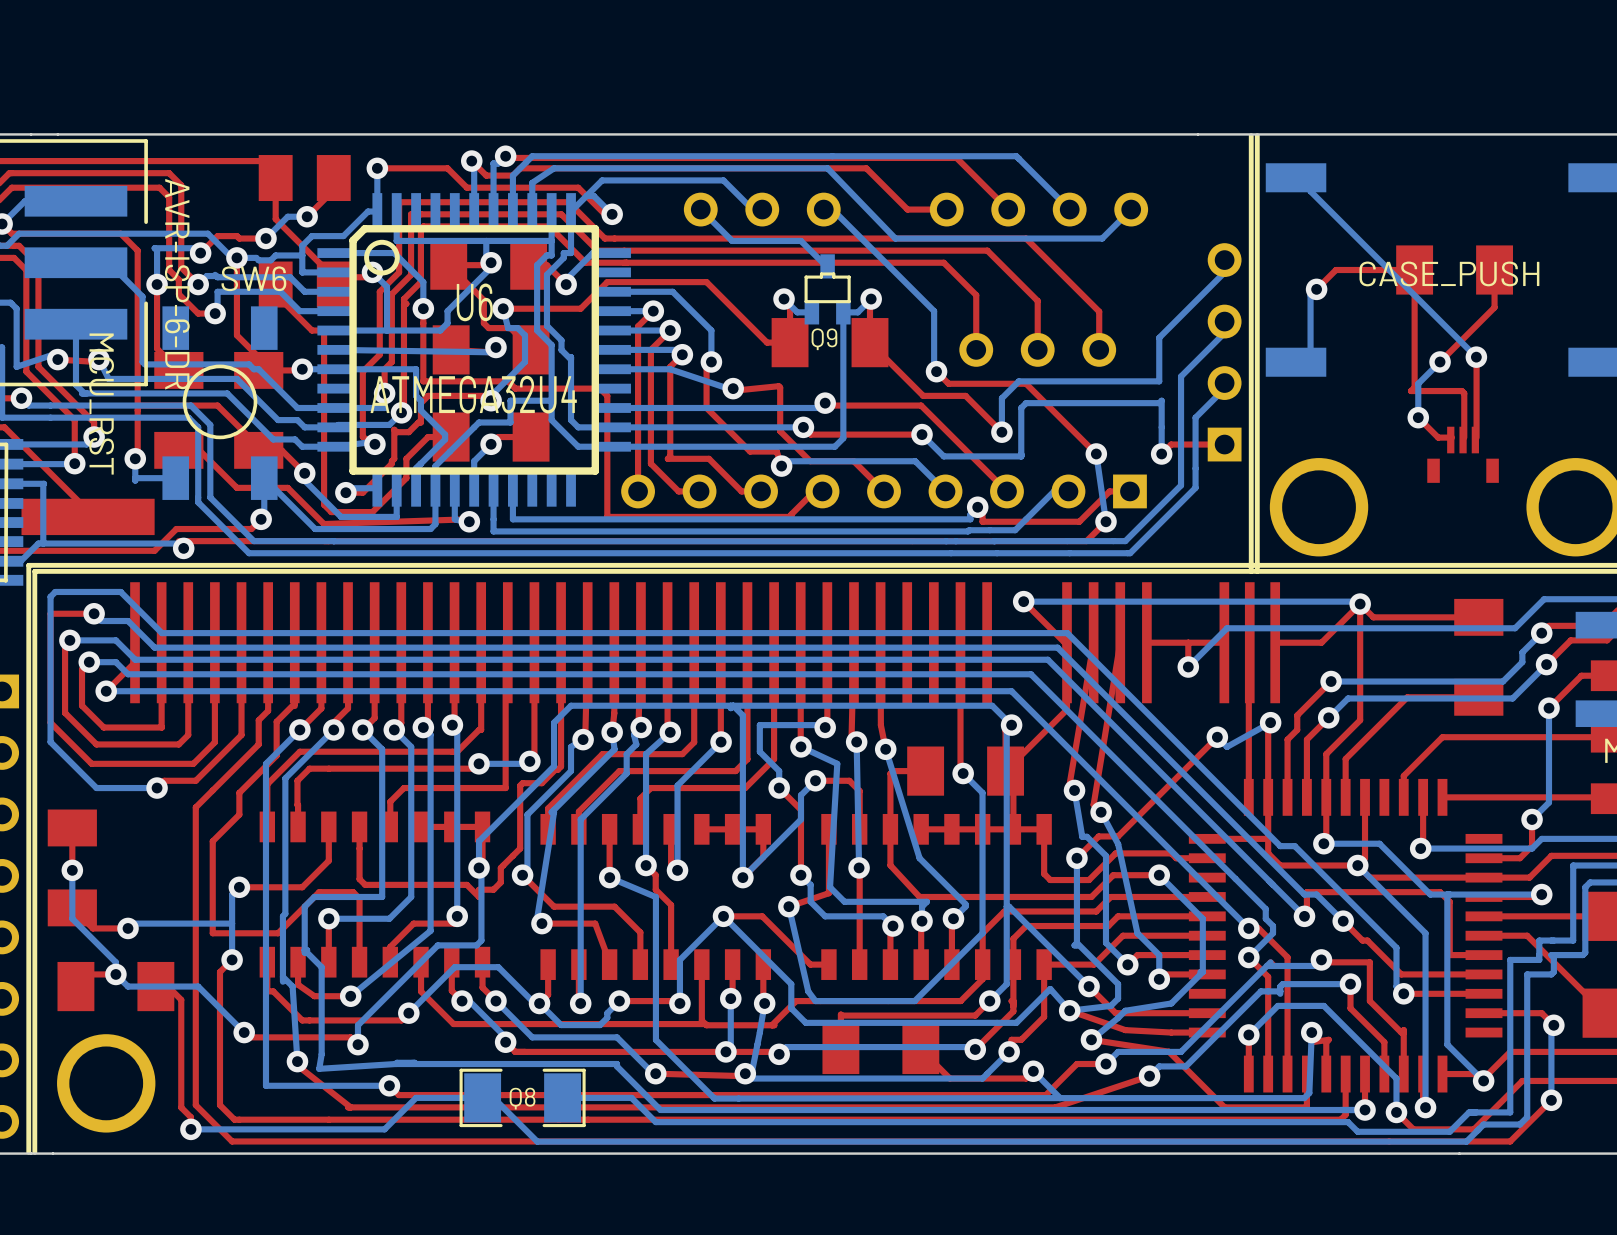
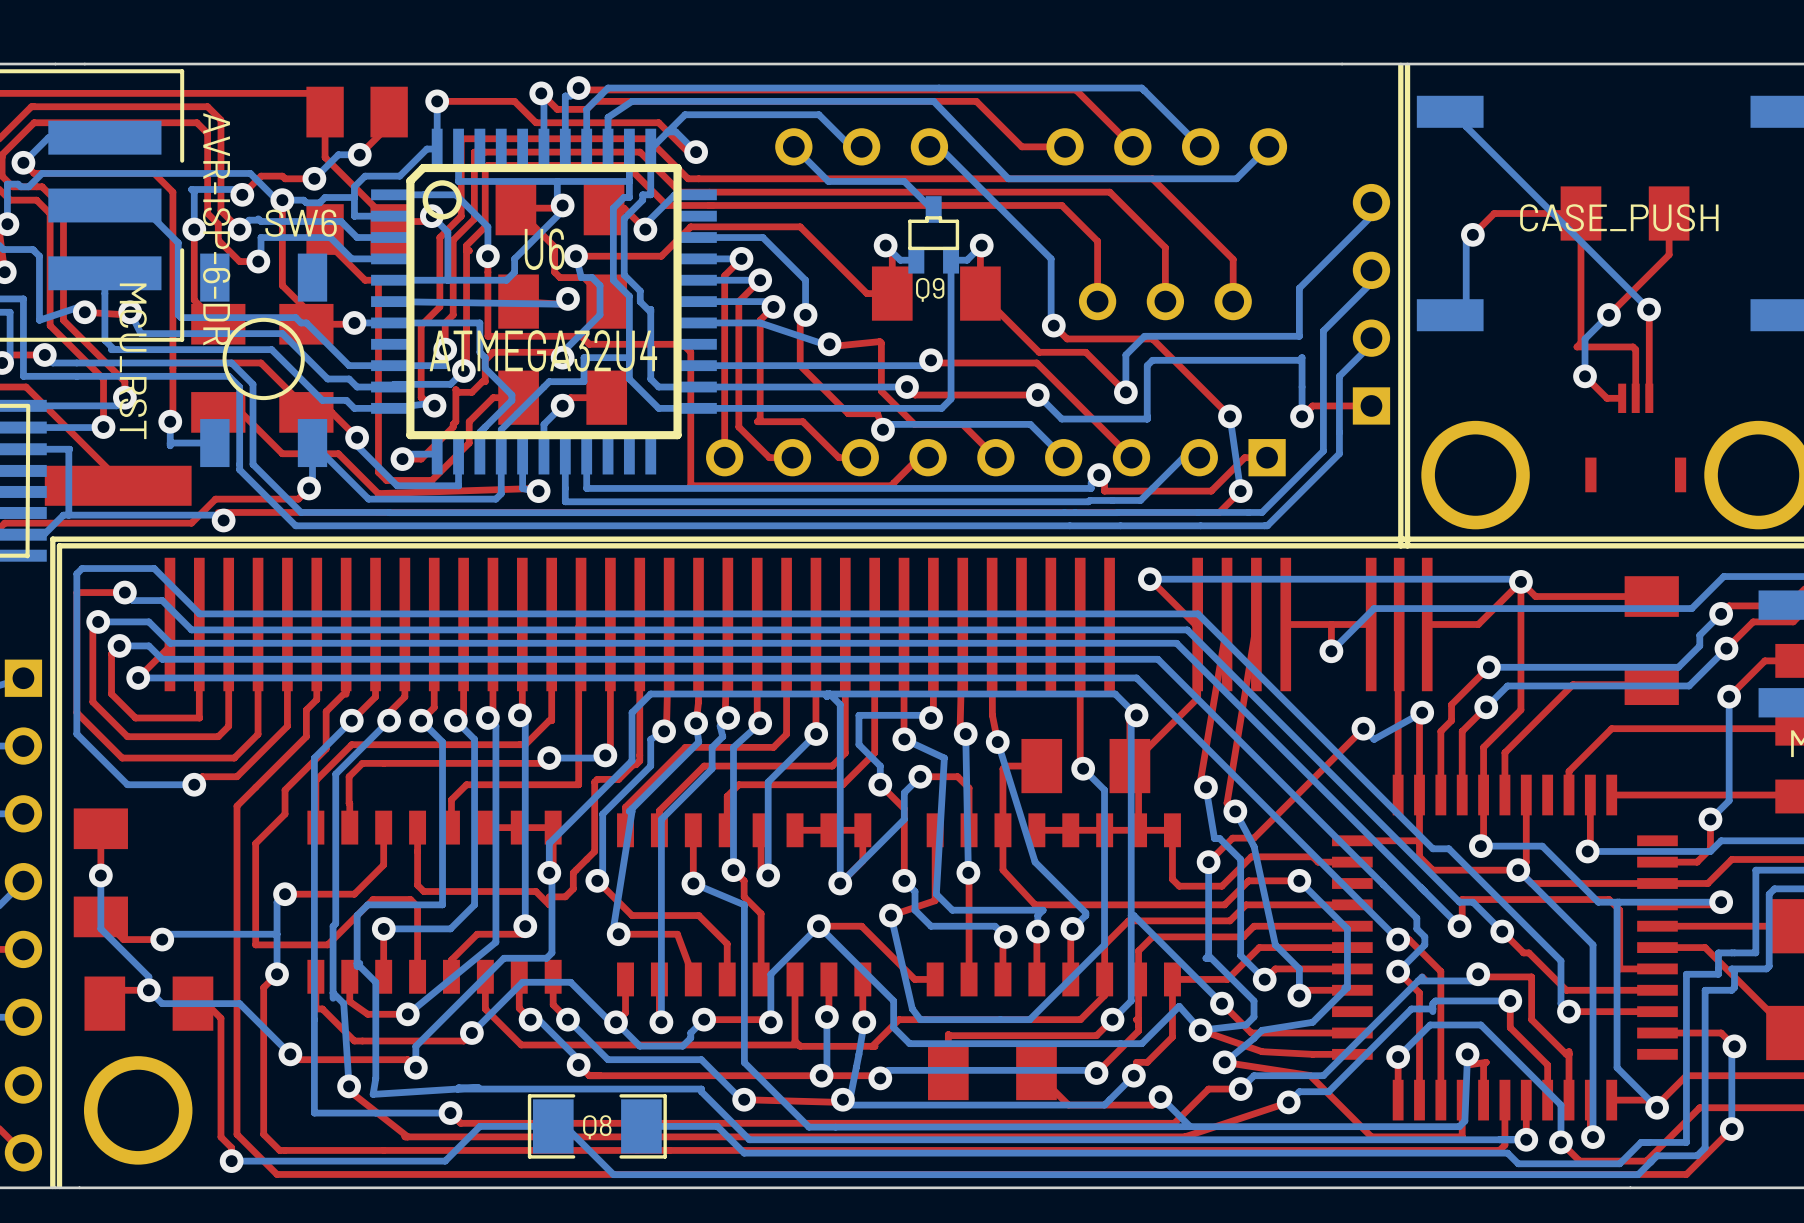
part footprint: [1427, 426, 1499, 483] -> [1585, 383, 1687, 493]

